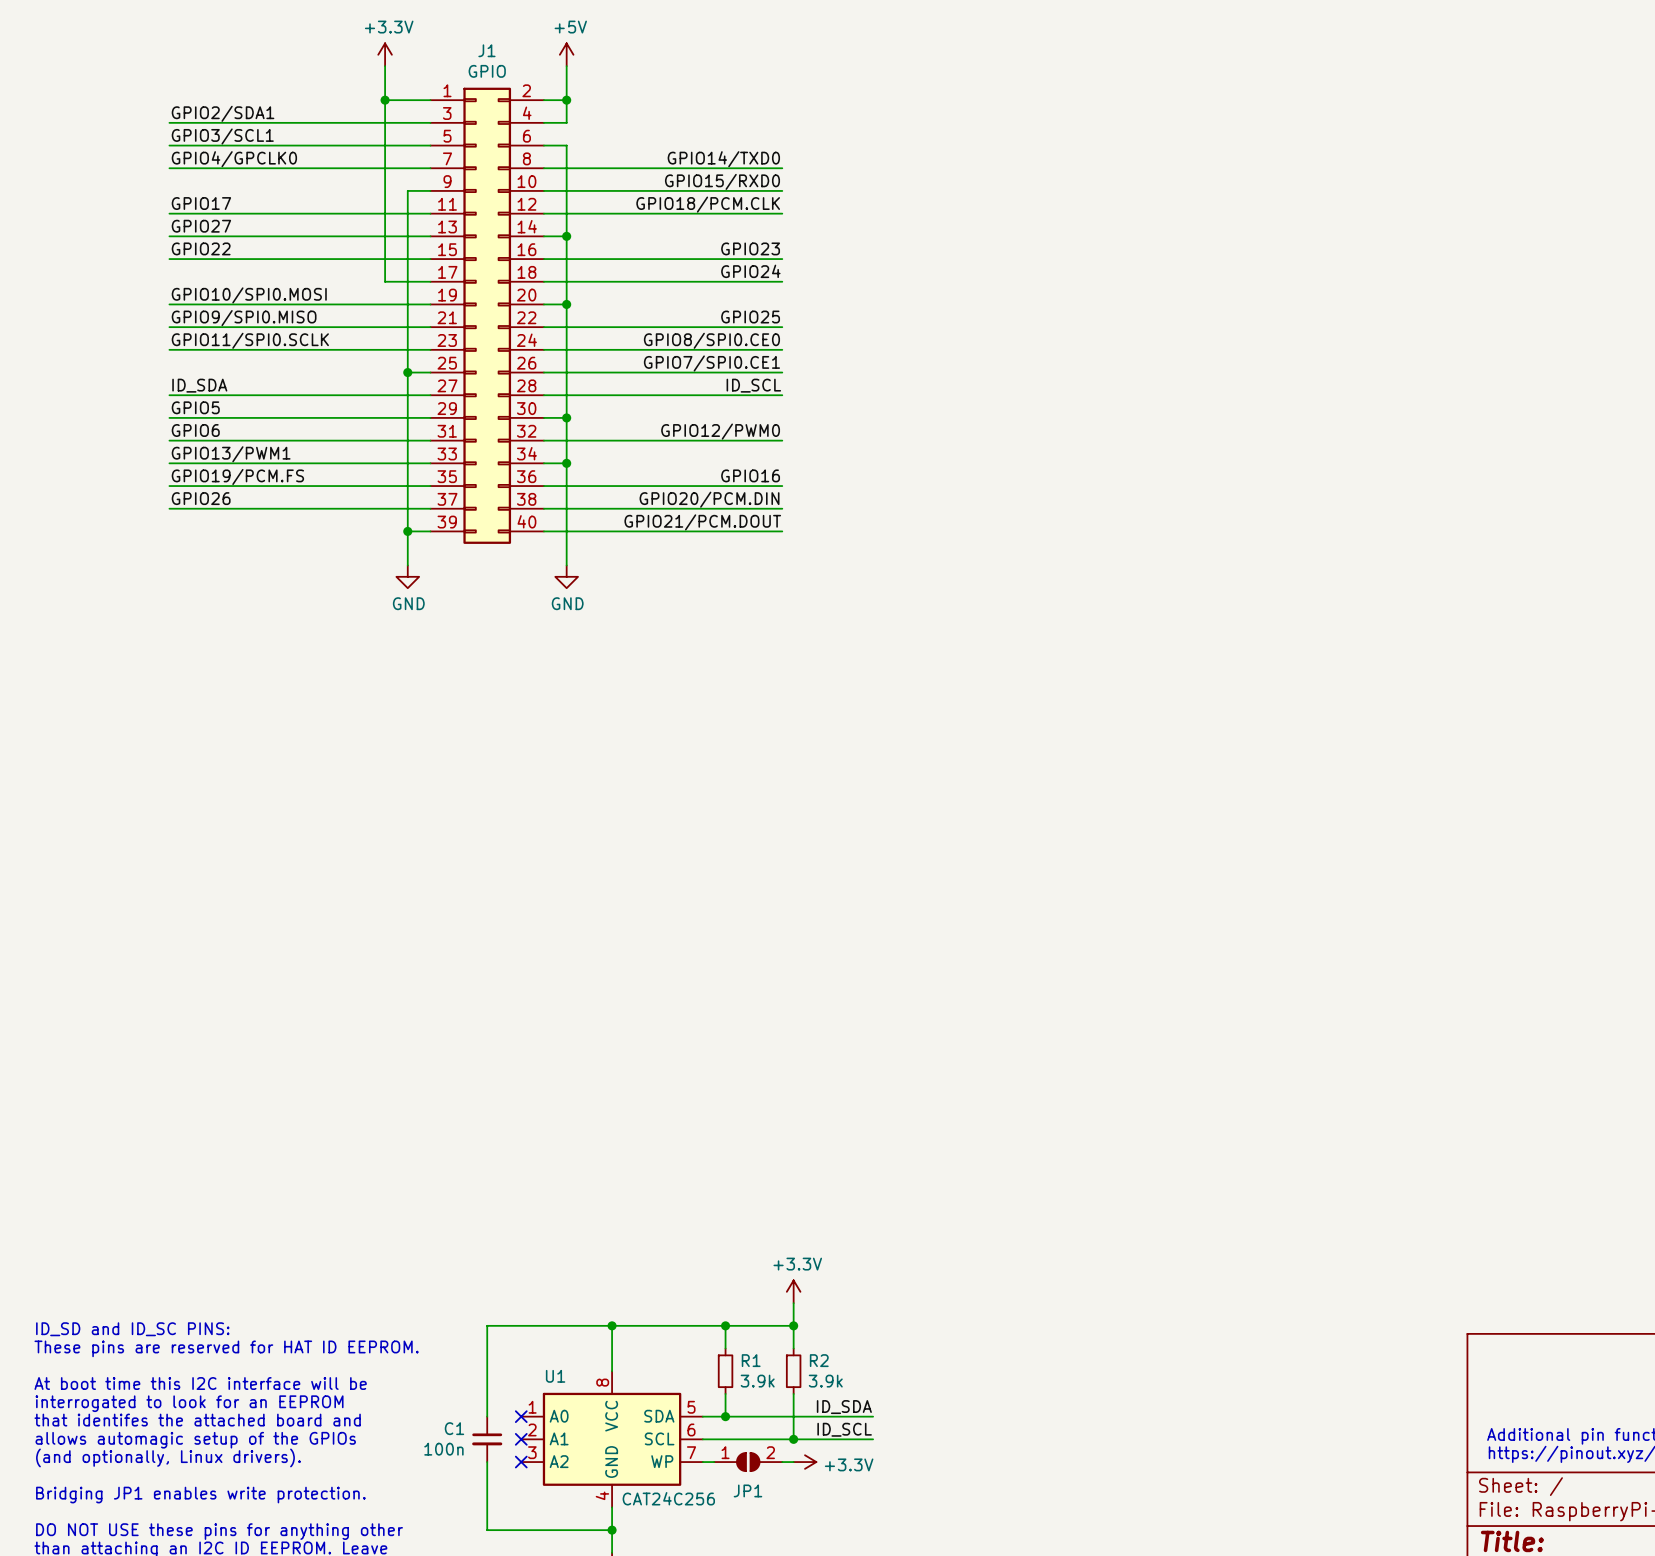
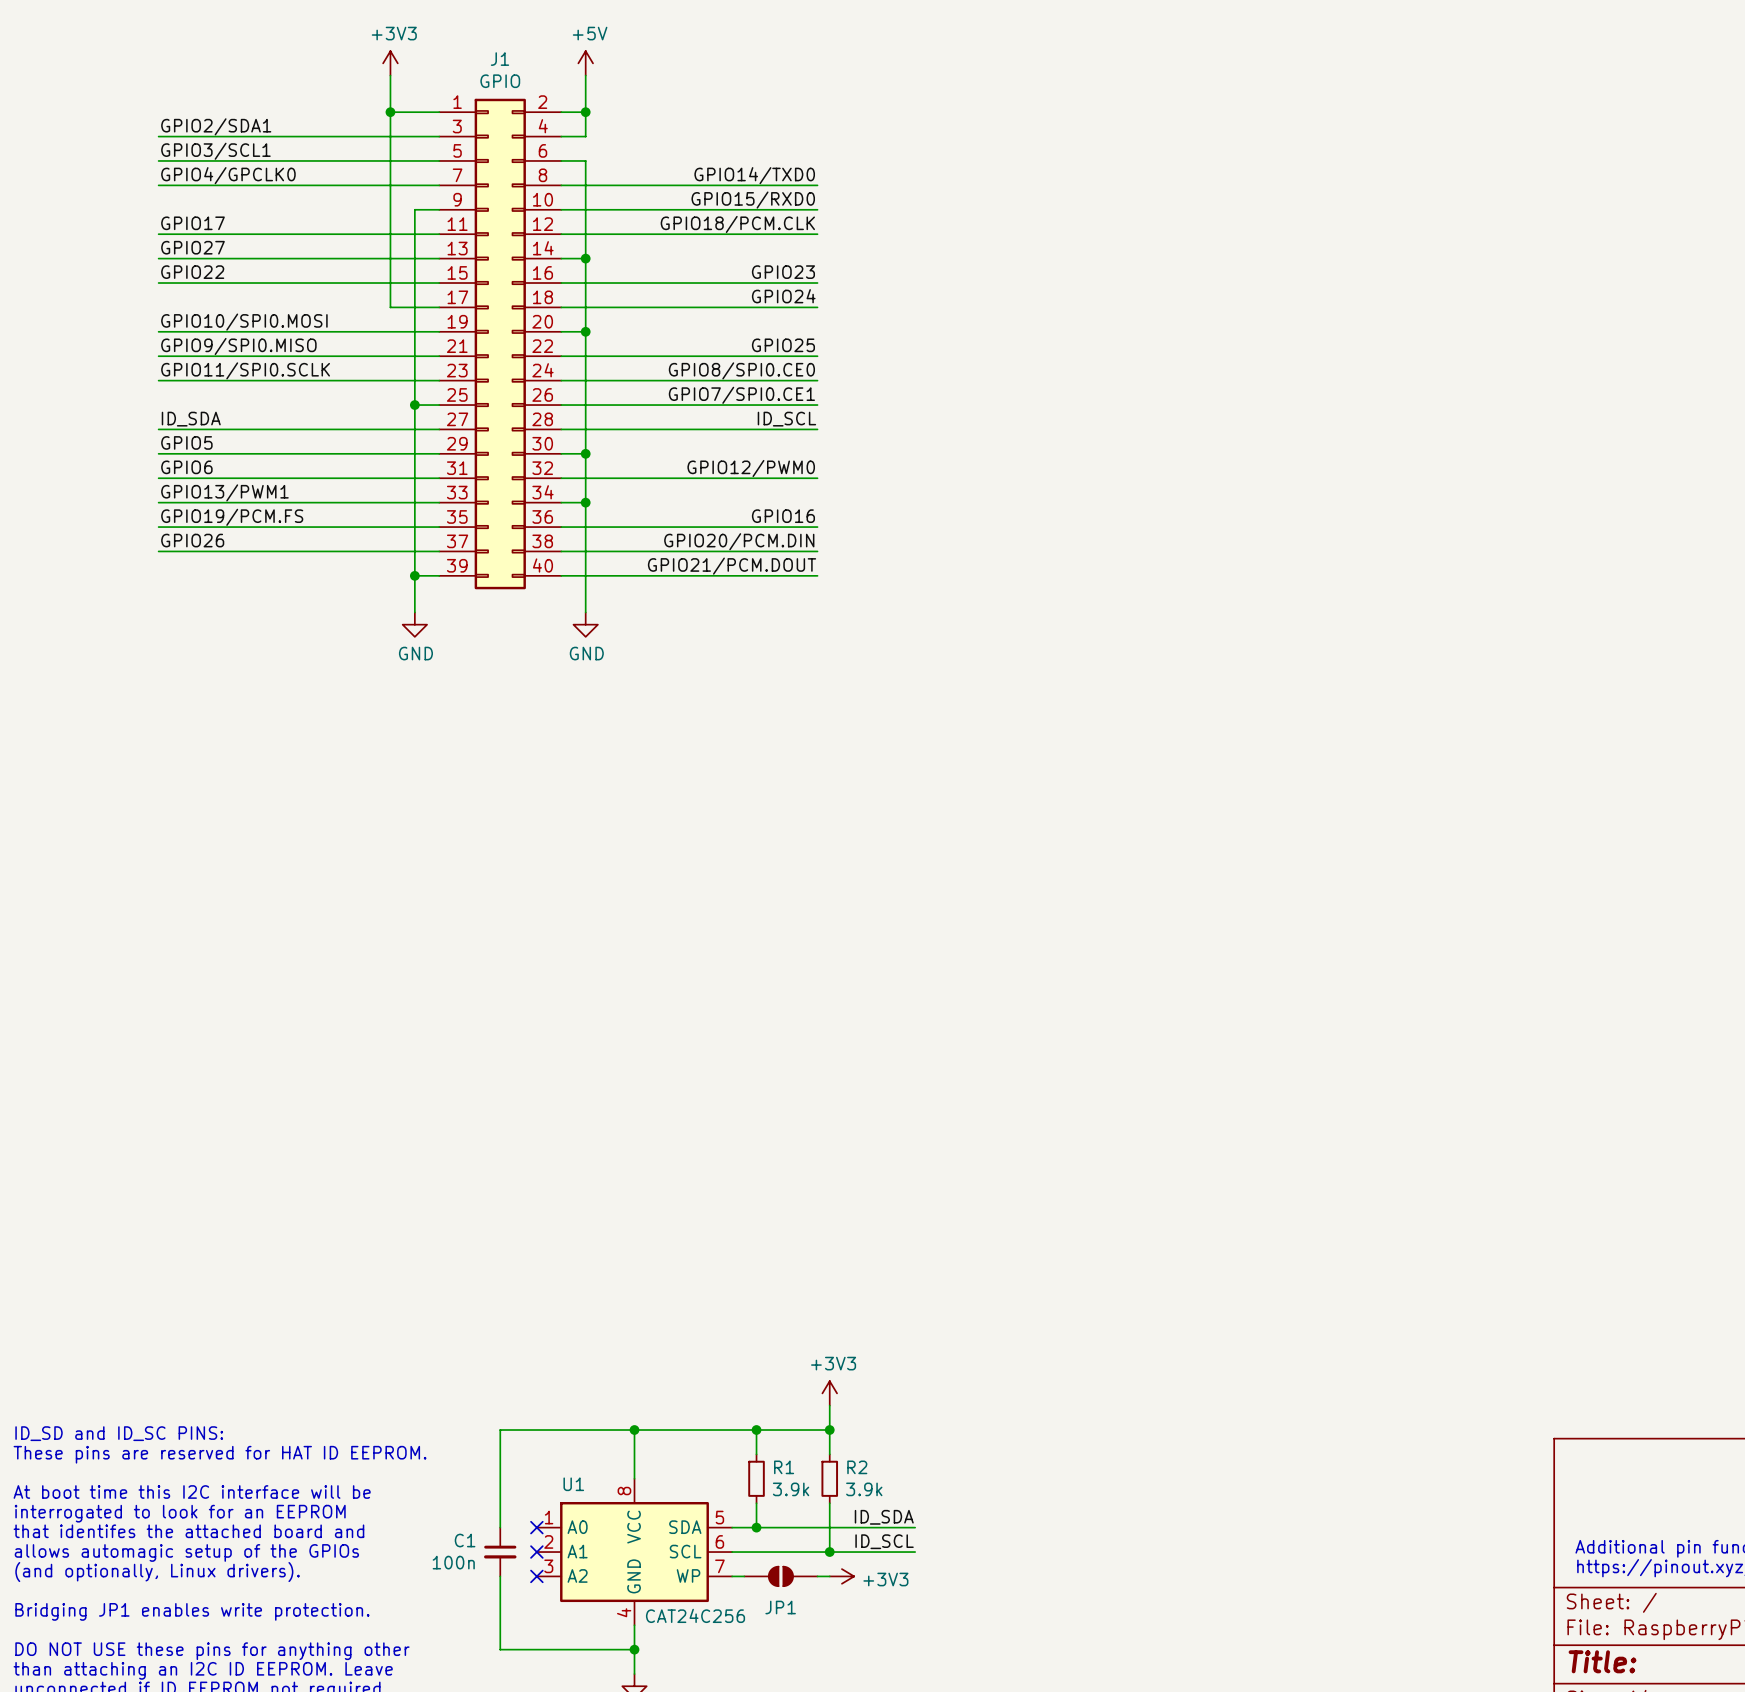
power symbol: +3.3V (385, 54) -> +3V3 (390, 63)
power symbol: +3.3V (793, 1291) -> +3V3 (829, 1393)
JP1 pin number: 1 (725, 1452) -> none
JP1 pin number: 2 (770, 1452) -> none
power symbol: +3.3V (804, 1462) -> +3V3 (841, 1576)

